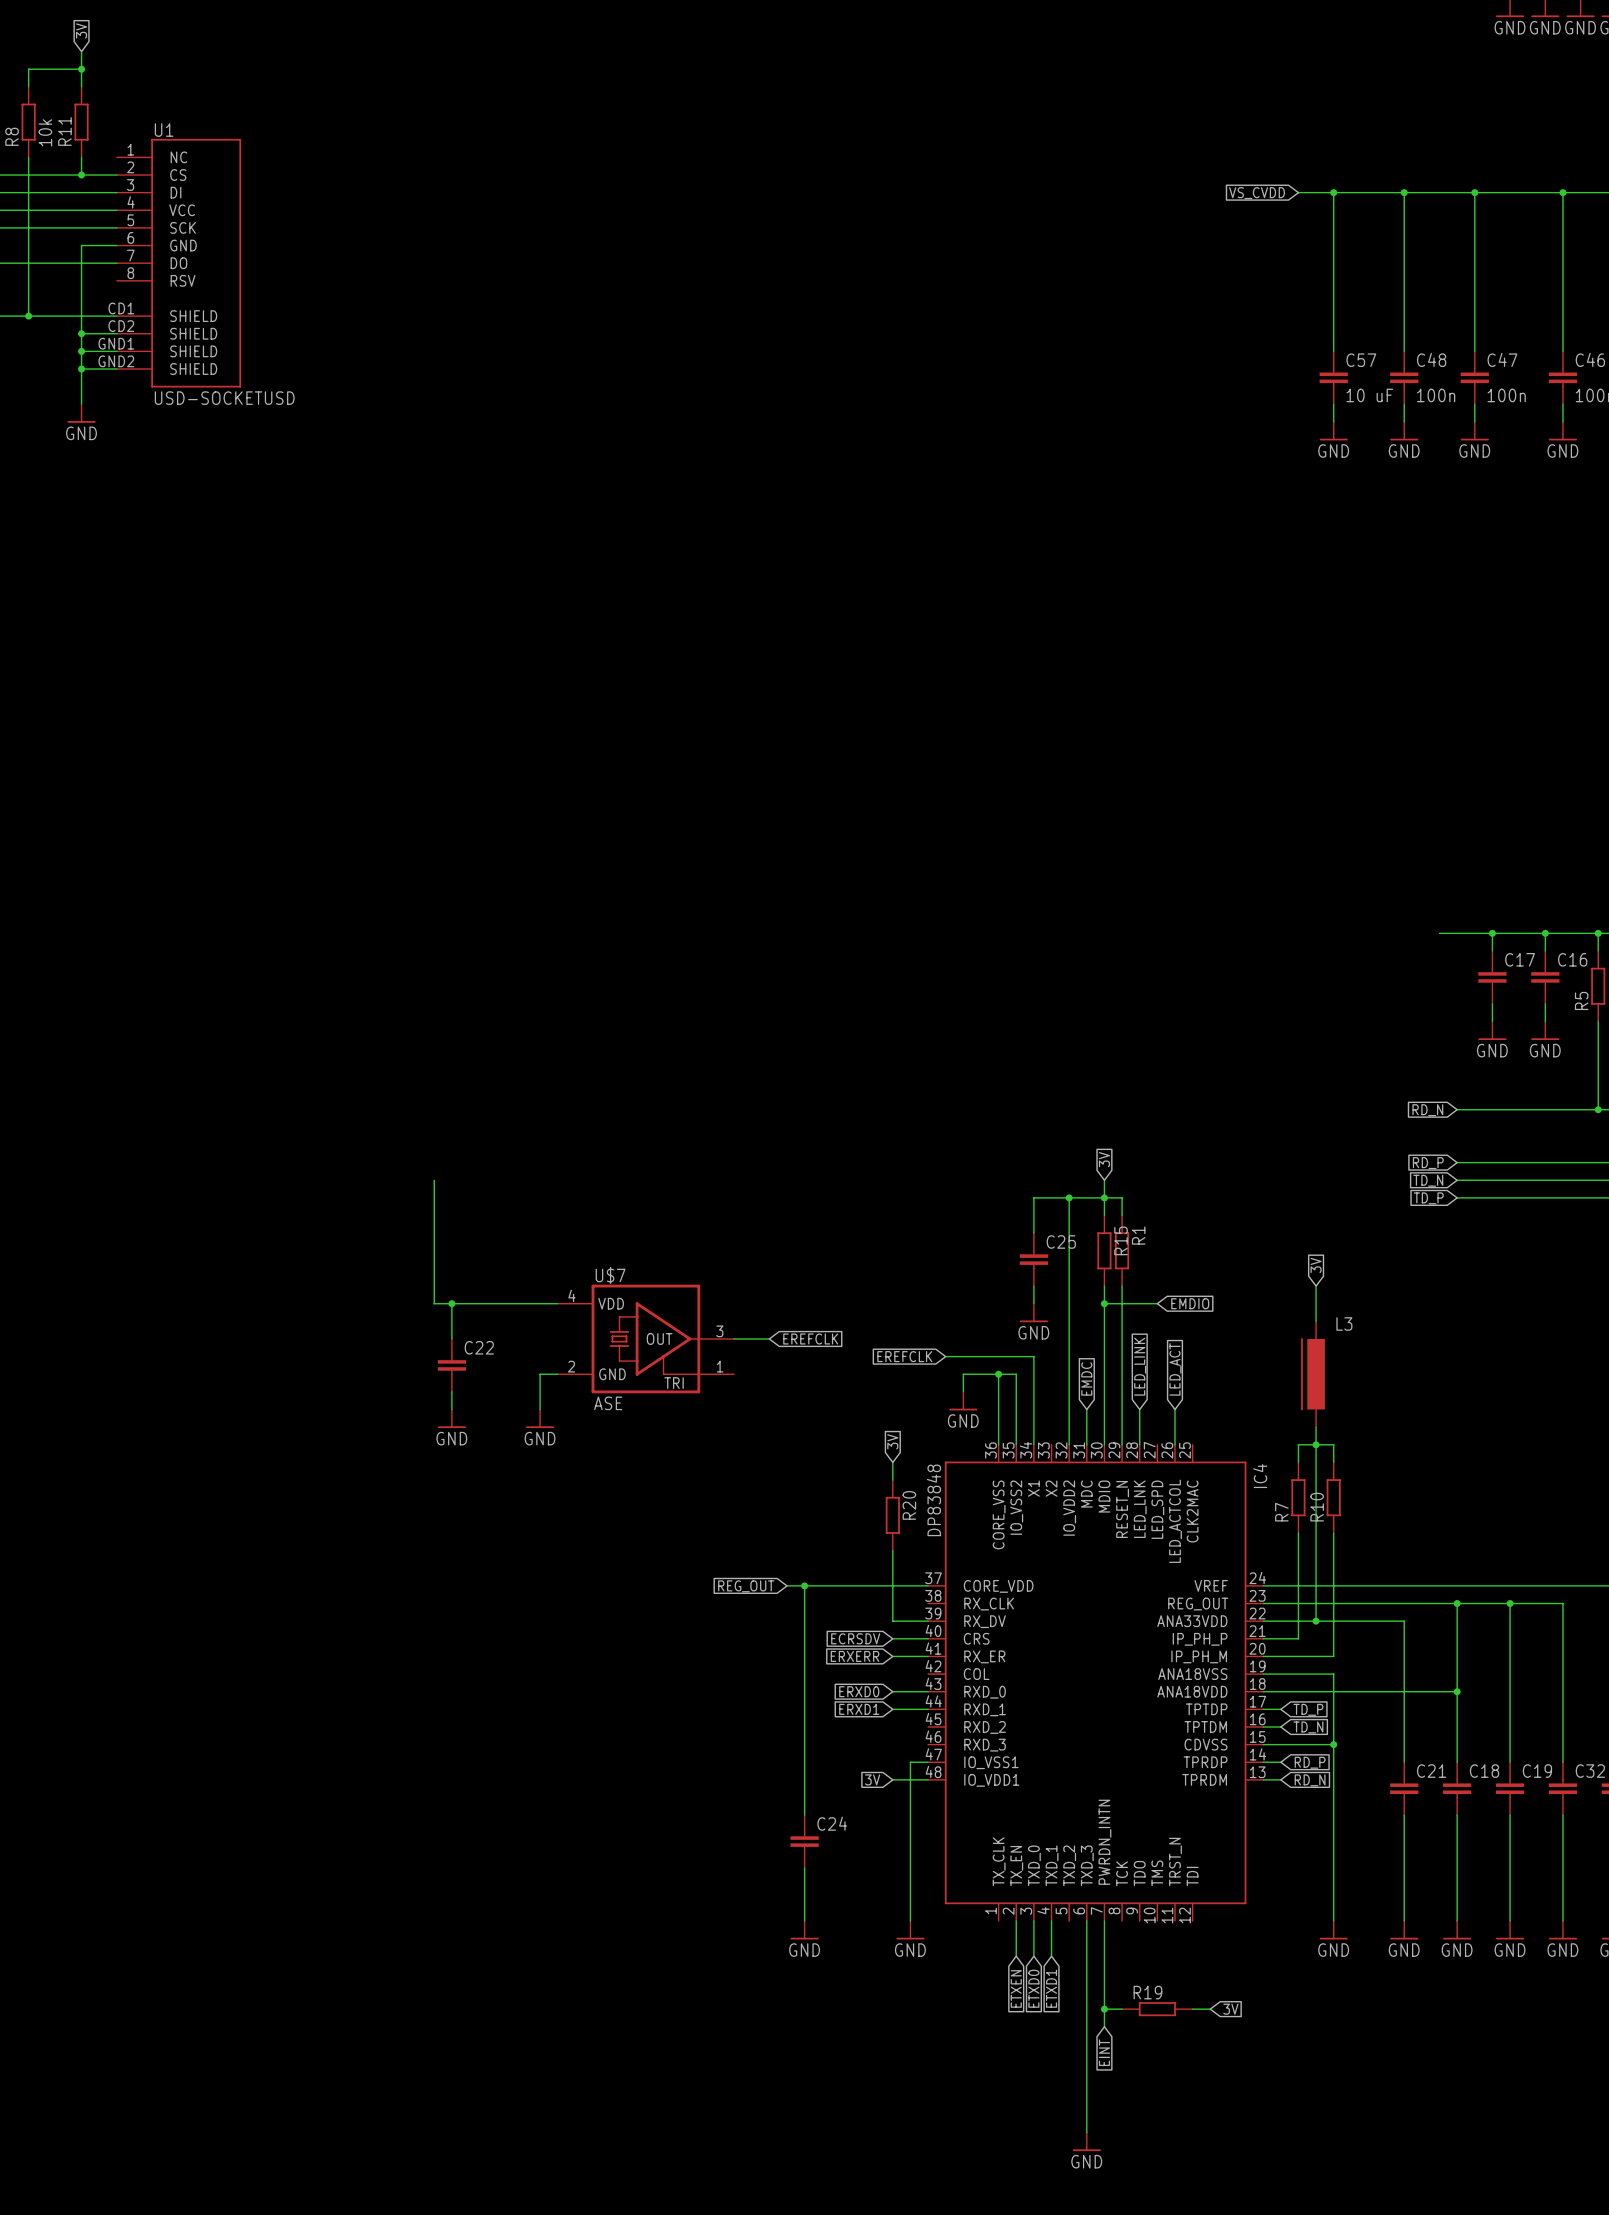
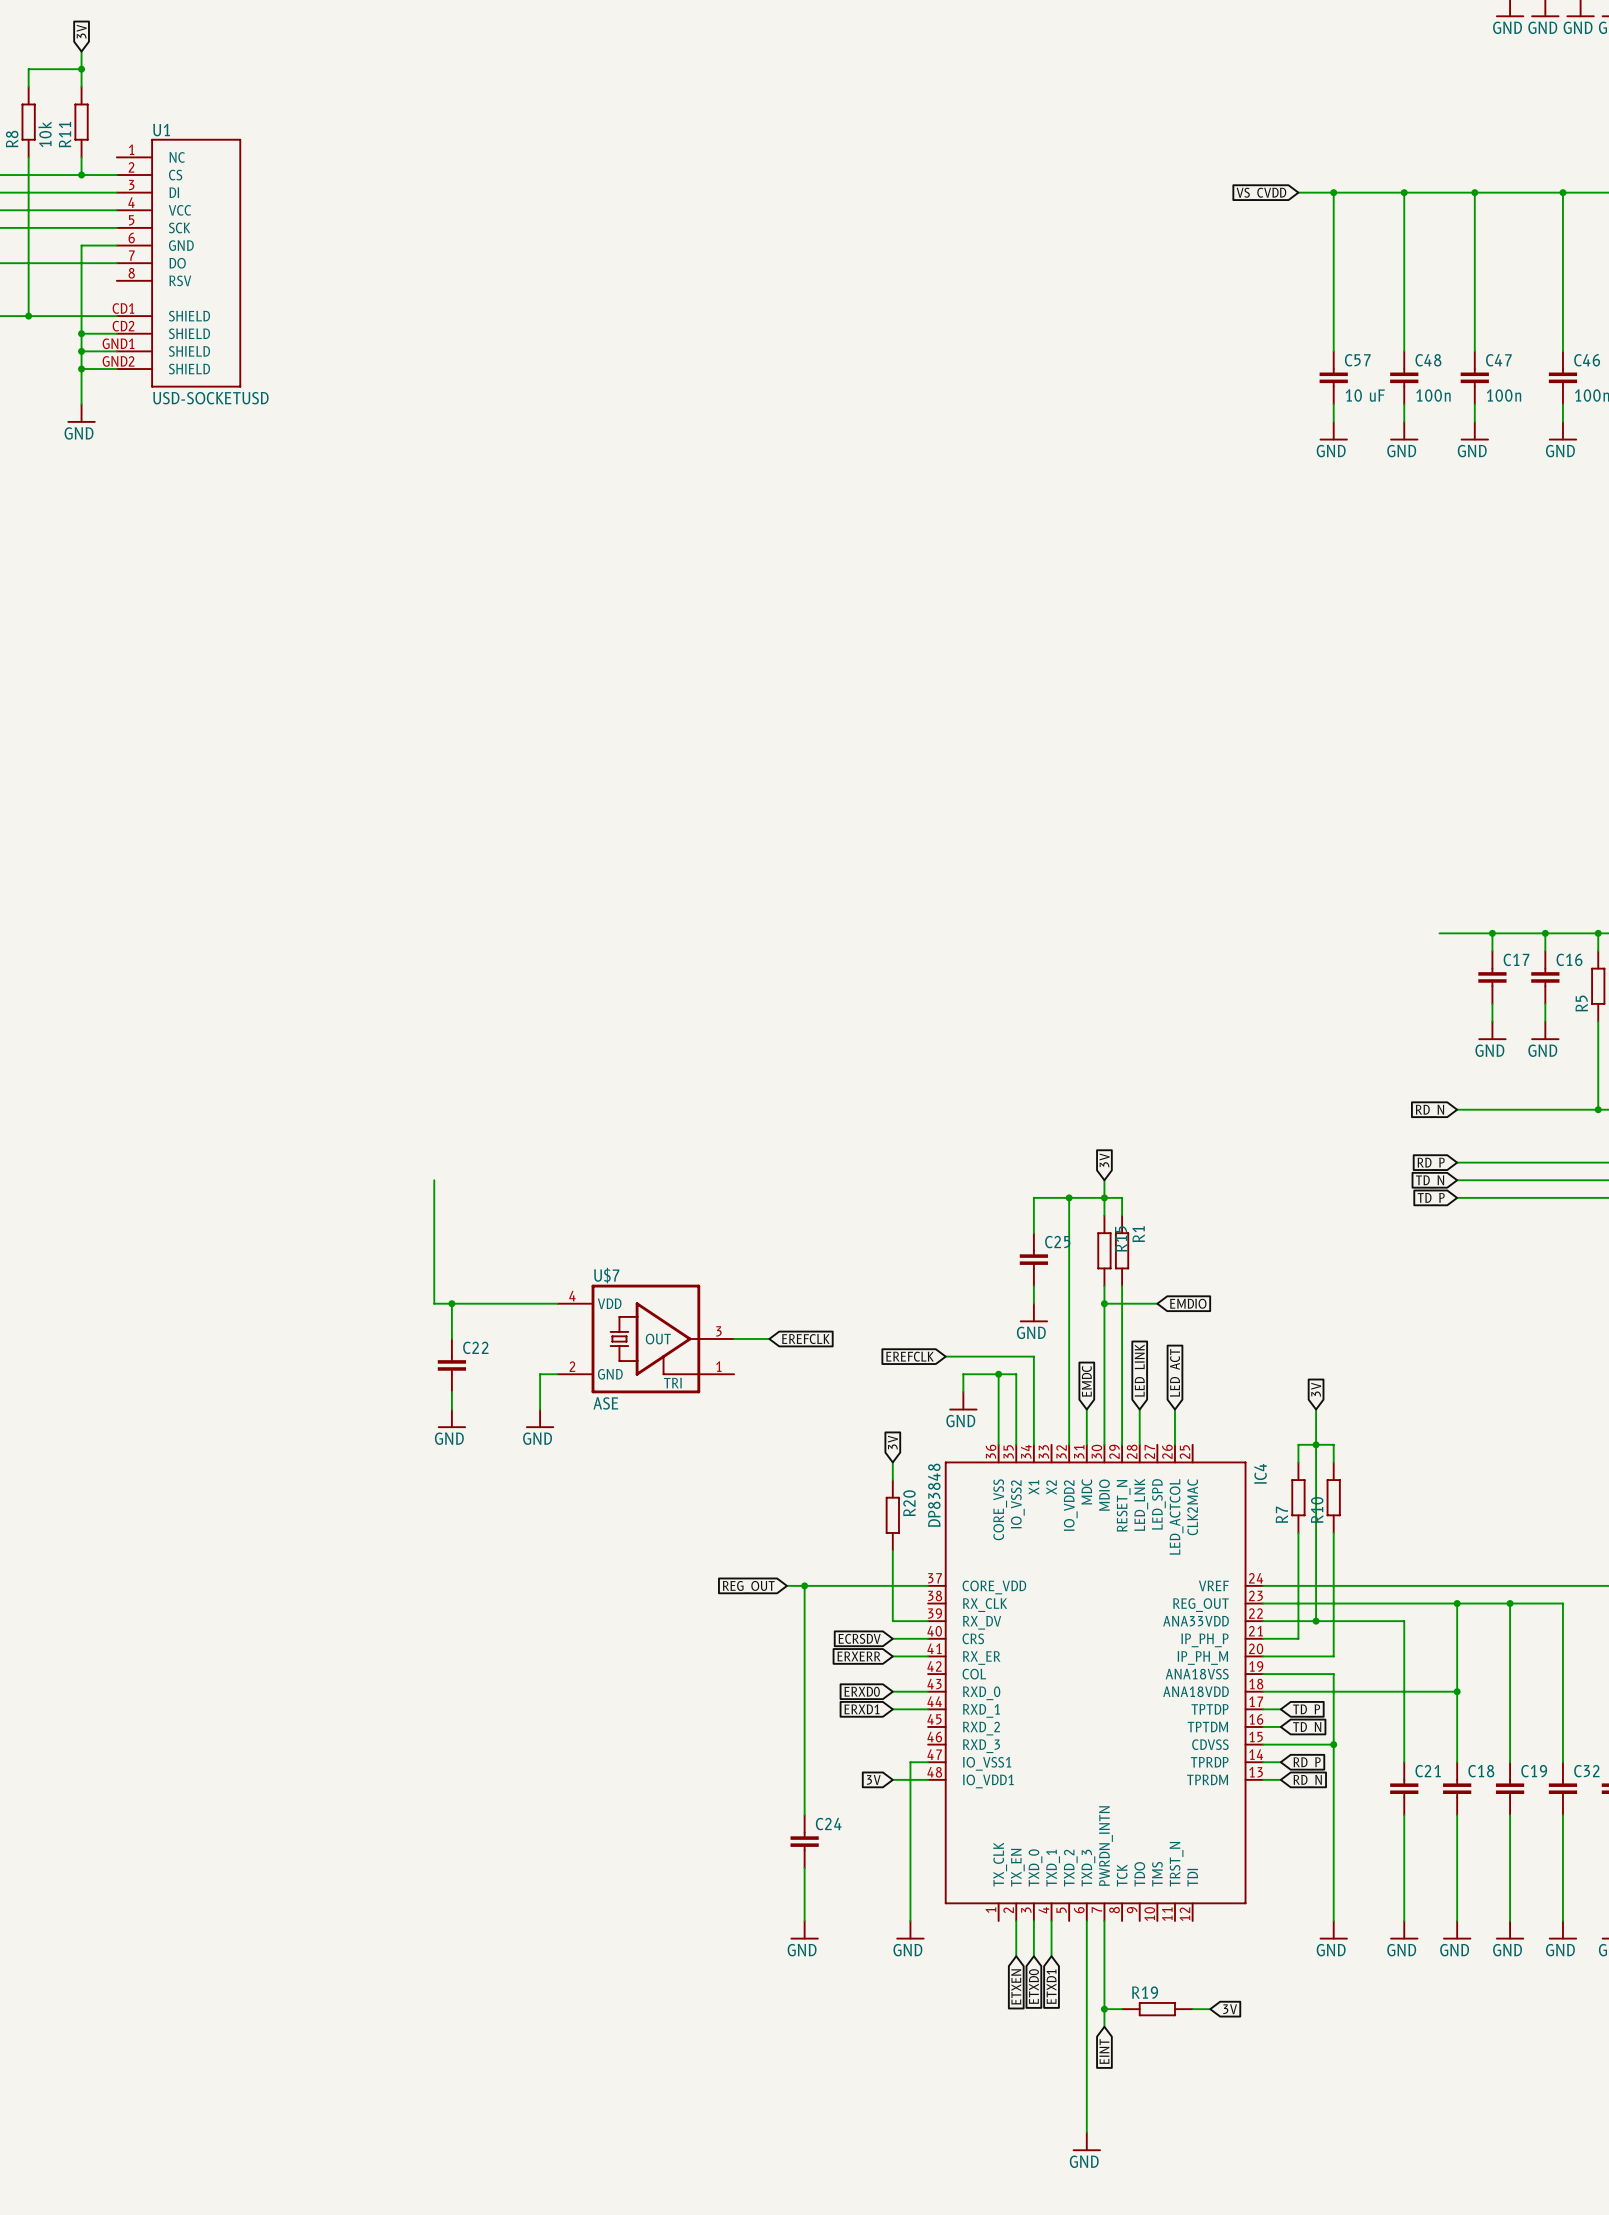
global label position: 3V (1316, 1265) -> 3V (1316, 1389)
wire: (1316, 1286) (1316, 1321) -> none
L3: (1312, 1374) -> none

